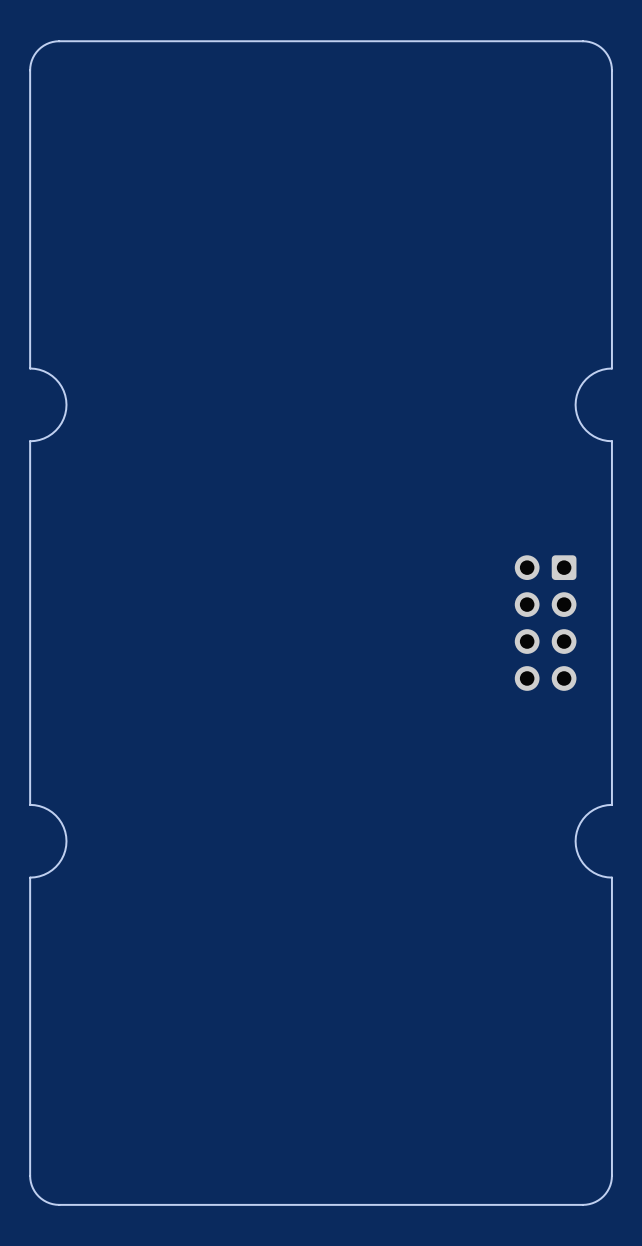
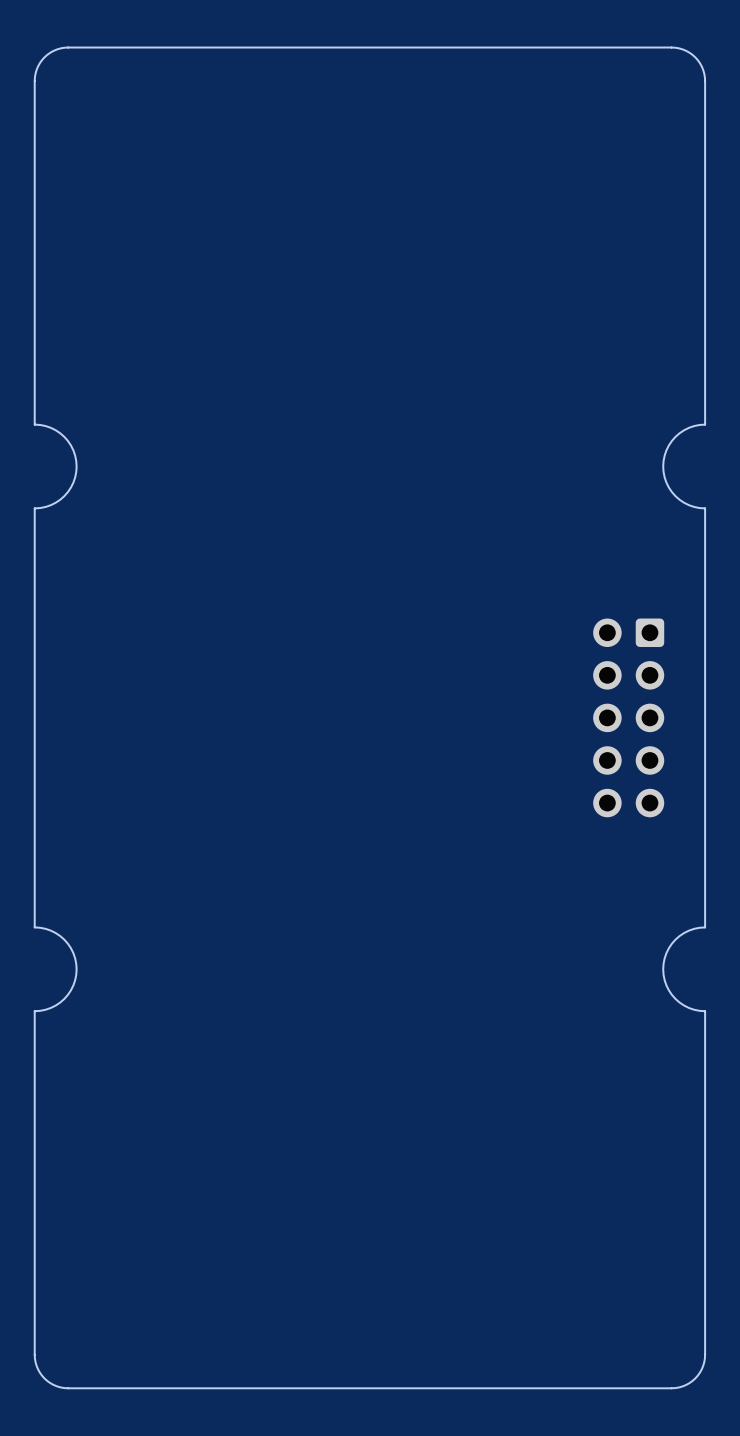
part footprint: [514, 555, 577, 691] -> [593, 618, 665, 818]

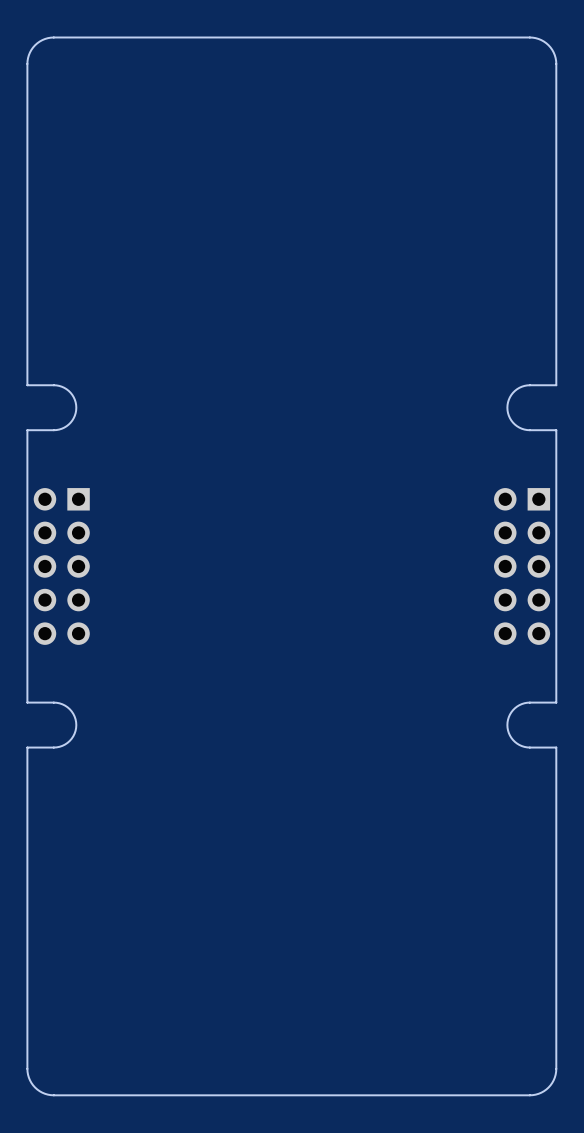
board edge: (34, 424) (50, 427) (64, 436) (73, 450) (76, 466) (73, 482) (64, 496) (50, 505) (34, 508) (34, 545) -> (27, 335) (27, 385) (56, 385) (64, 387) (73, 397) (76, 407) (73, 418) (64, 427) (56, 430) (27, 430)
board edge: (705, 424) (689, 427) (675, 436) (666, 450) (663, 466) (666, 482) (675, 496) (689, 505) (705, 508) (705, 545) -> (556, 335) (556, 385) (527, 385) (519, 387) (511, 394) (507, 407) (511, 420) (519, 427) (527, 430) (556, 430)
part: none -> (61, 566)
part: (628, 717) -> none
part: none -> (522, 566)
board edge: (34, 890) (34, 927) (50, 930) (64, 939) (73, 953) (76, 969) (73, 985) (64, 998) (50, 1008) (34, 1011) -> (27, 702) (62, 704) (71, 711) (76, 725) (71, 738) (62, 745) (27, 747) (27, 797)
board edge: (705, 890) (705, 927) (689, 930) (675, 939) (666, 953) (663, 969) (666, 985) (675, 998) (689, 1008) (705, 1011) -> (556, 702) (527, 702) (519, 705) (511, 712) (507, 725) (511, 737) (519, 744) (527, 747) (556, 747) (556, 797)

